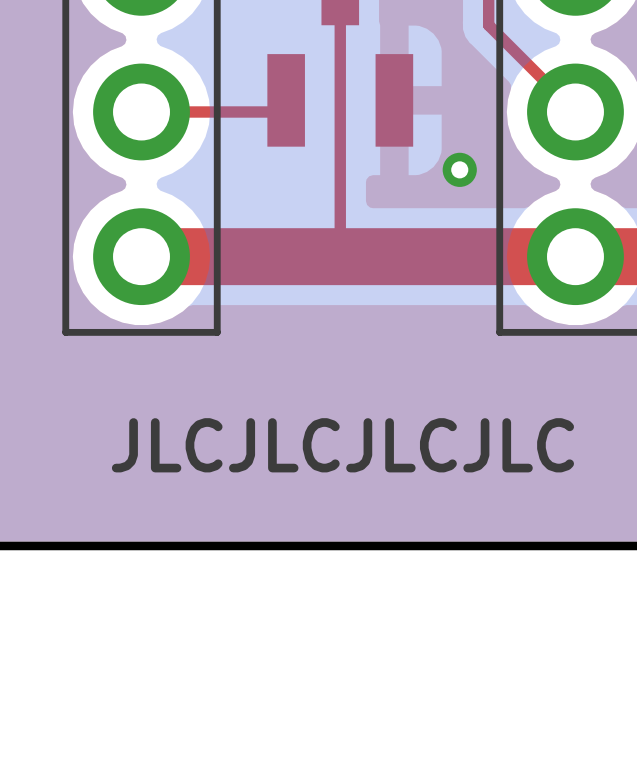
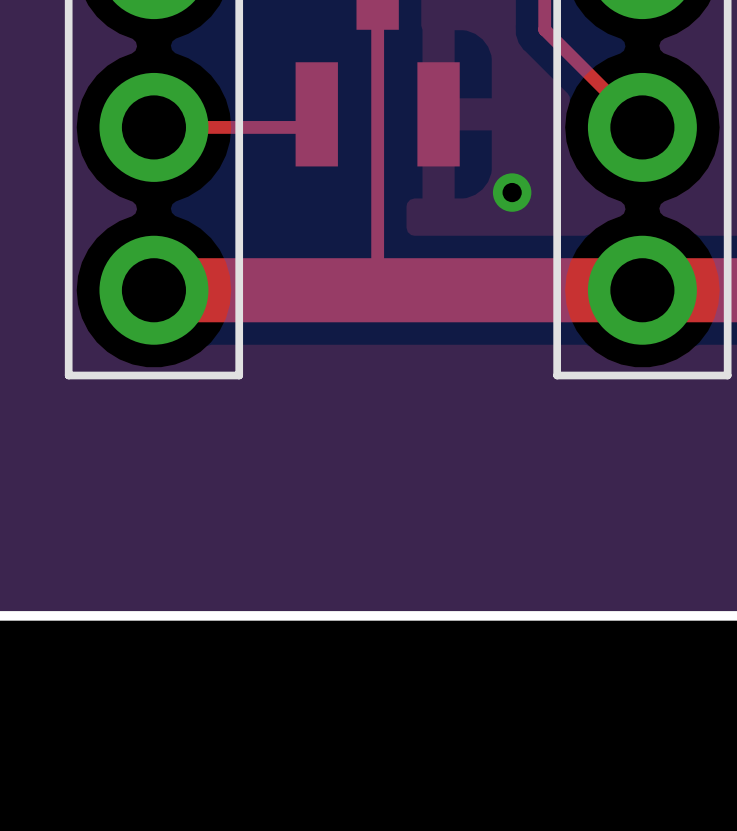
text: JLCJLCJLCJLC (342, 445) -> none

